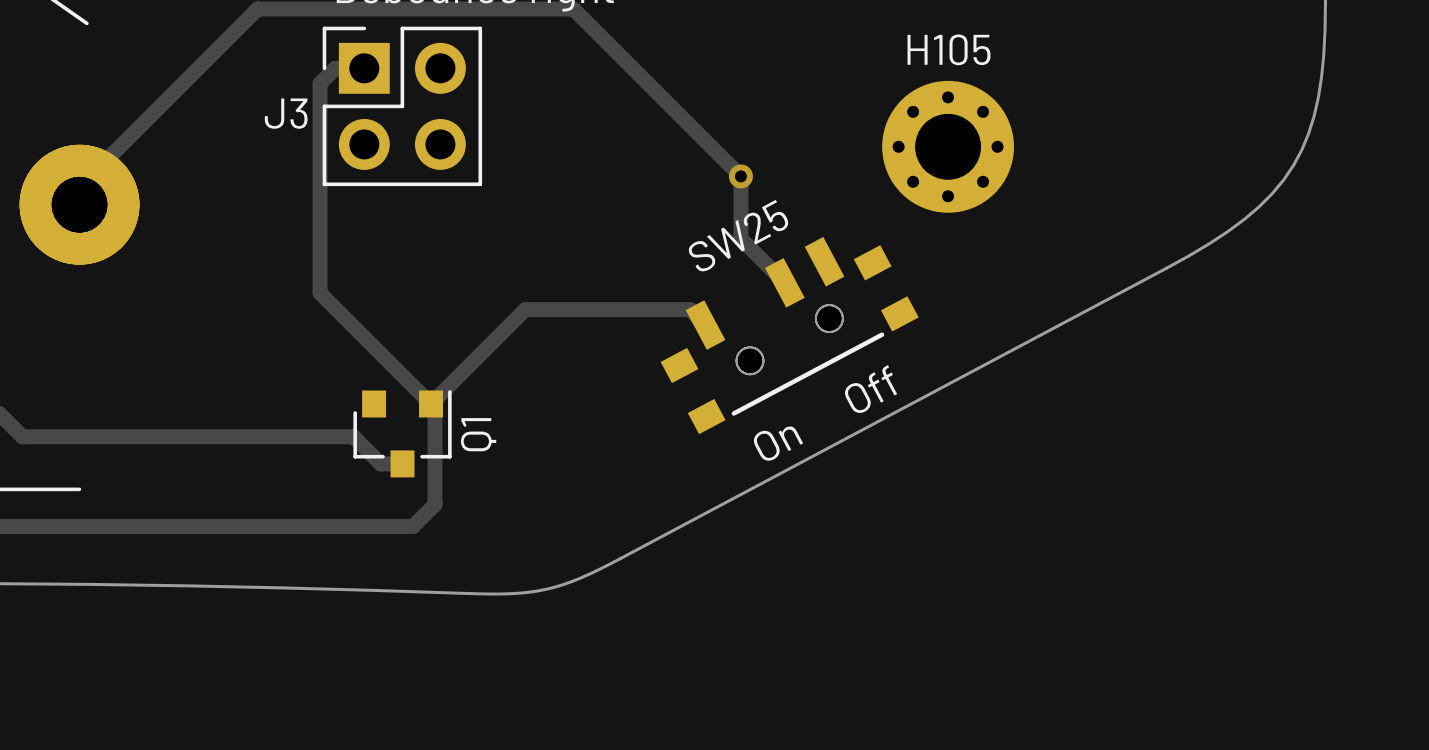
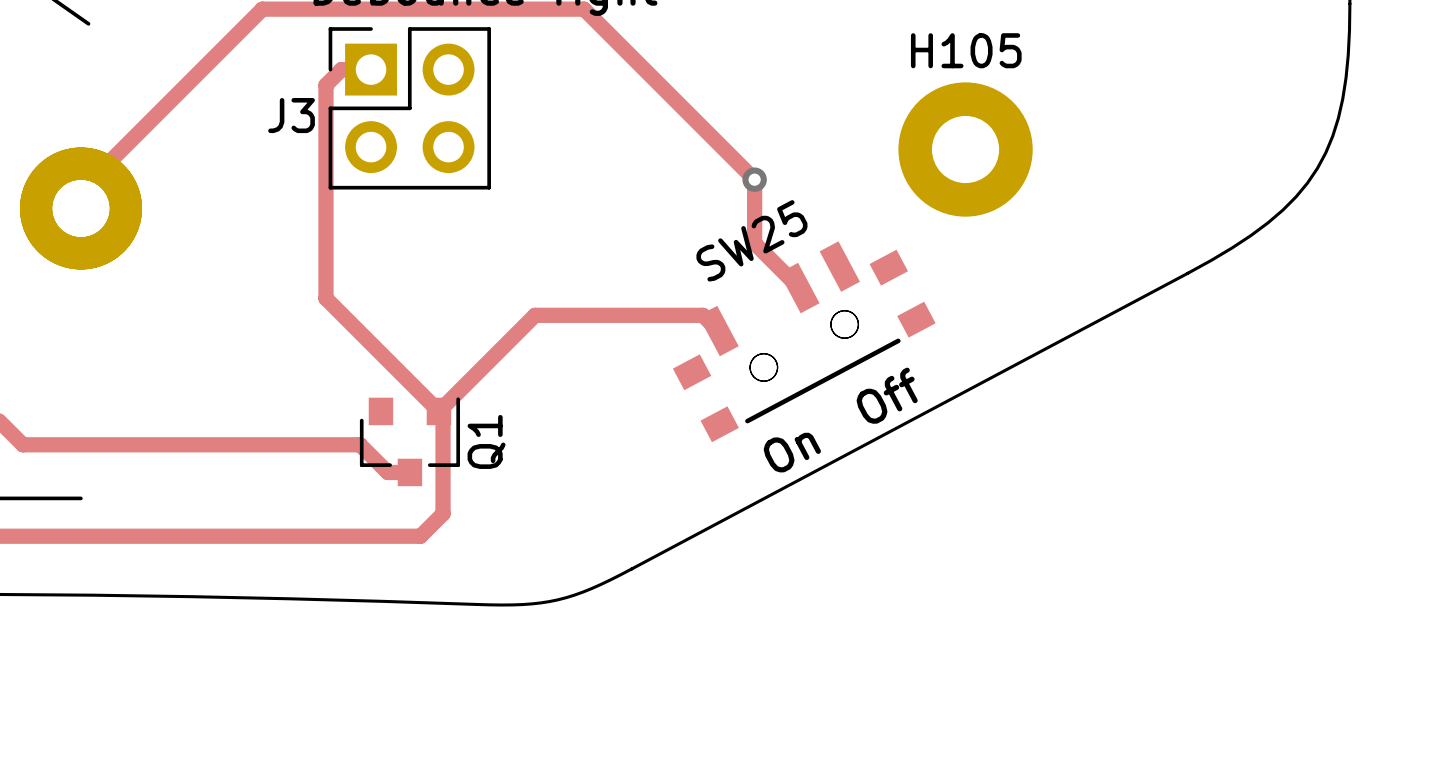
H105 footprint: [882, 80, 1014, 213] -> [898, 82, 1033, 217]

